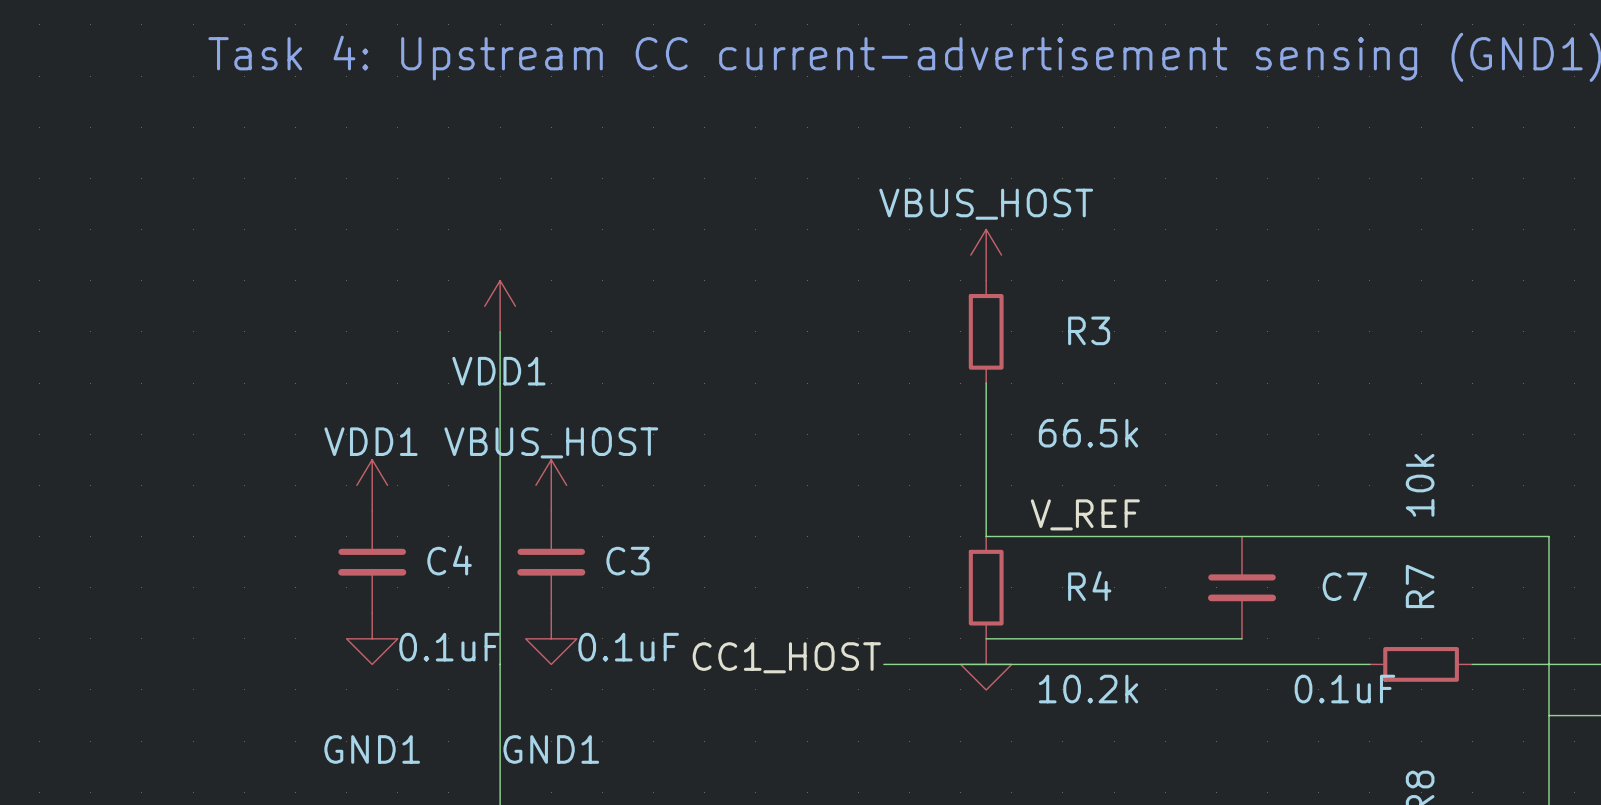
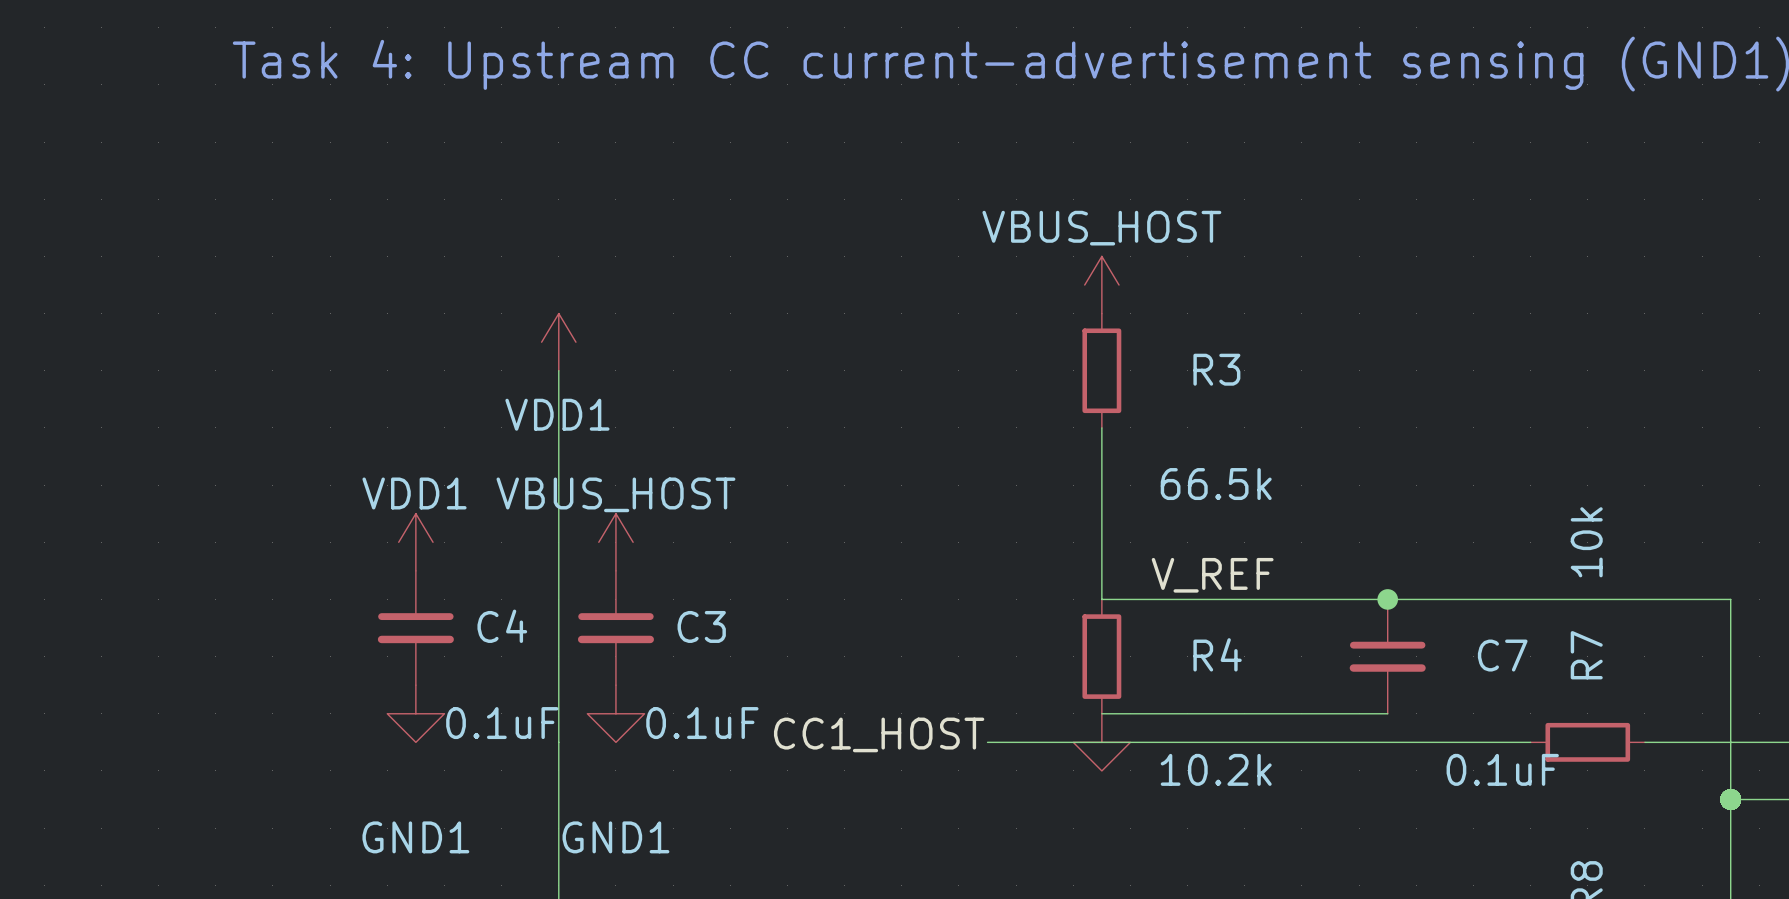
junction: none -> (1387, 599)
junction: none -> (1730, 799)

